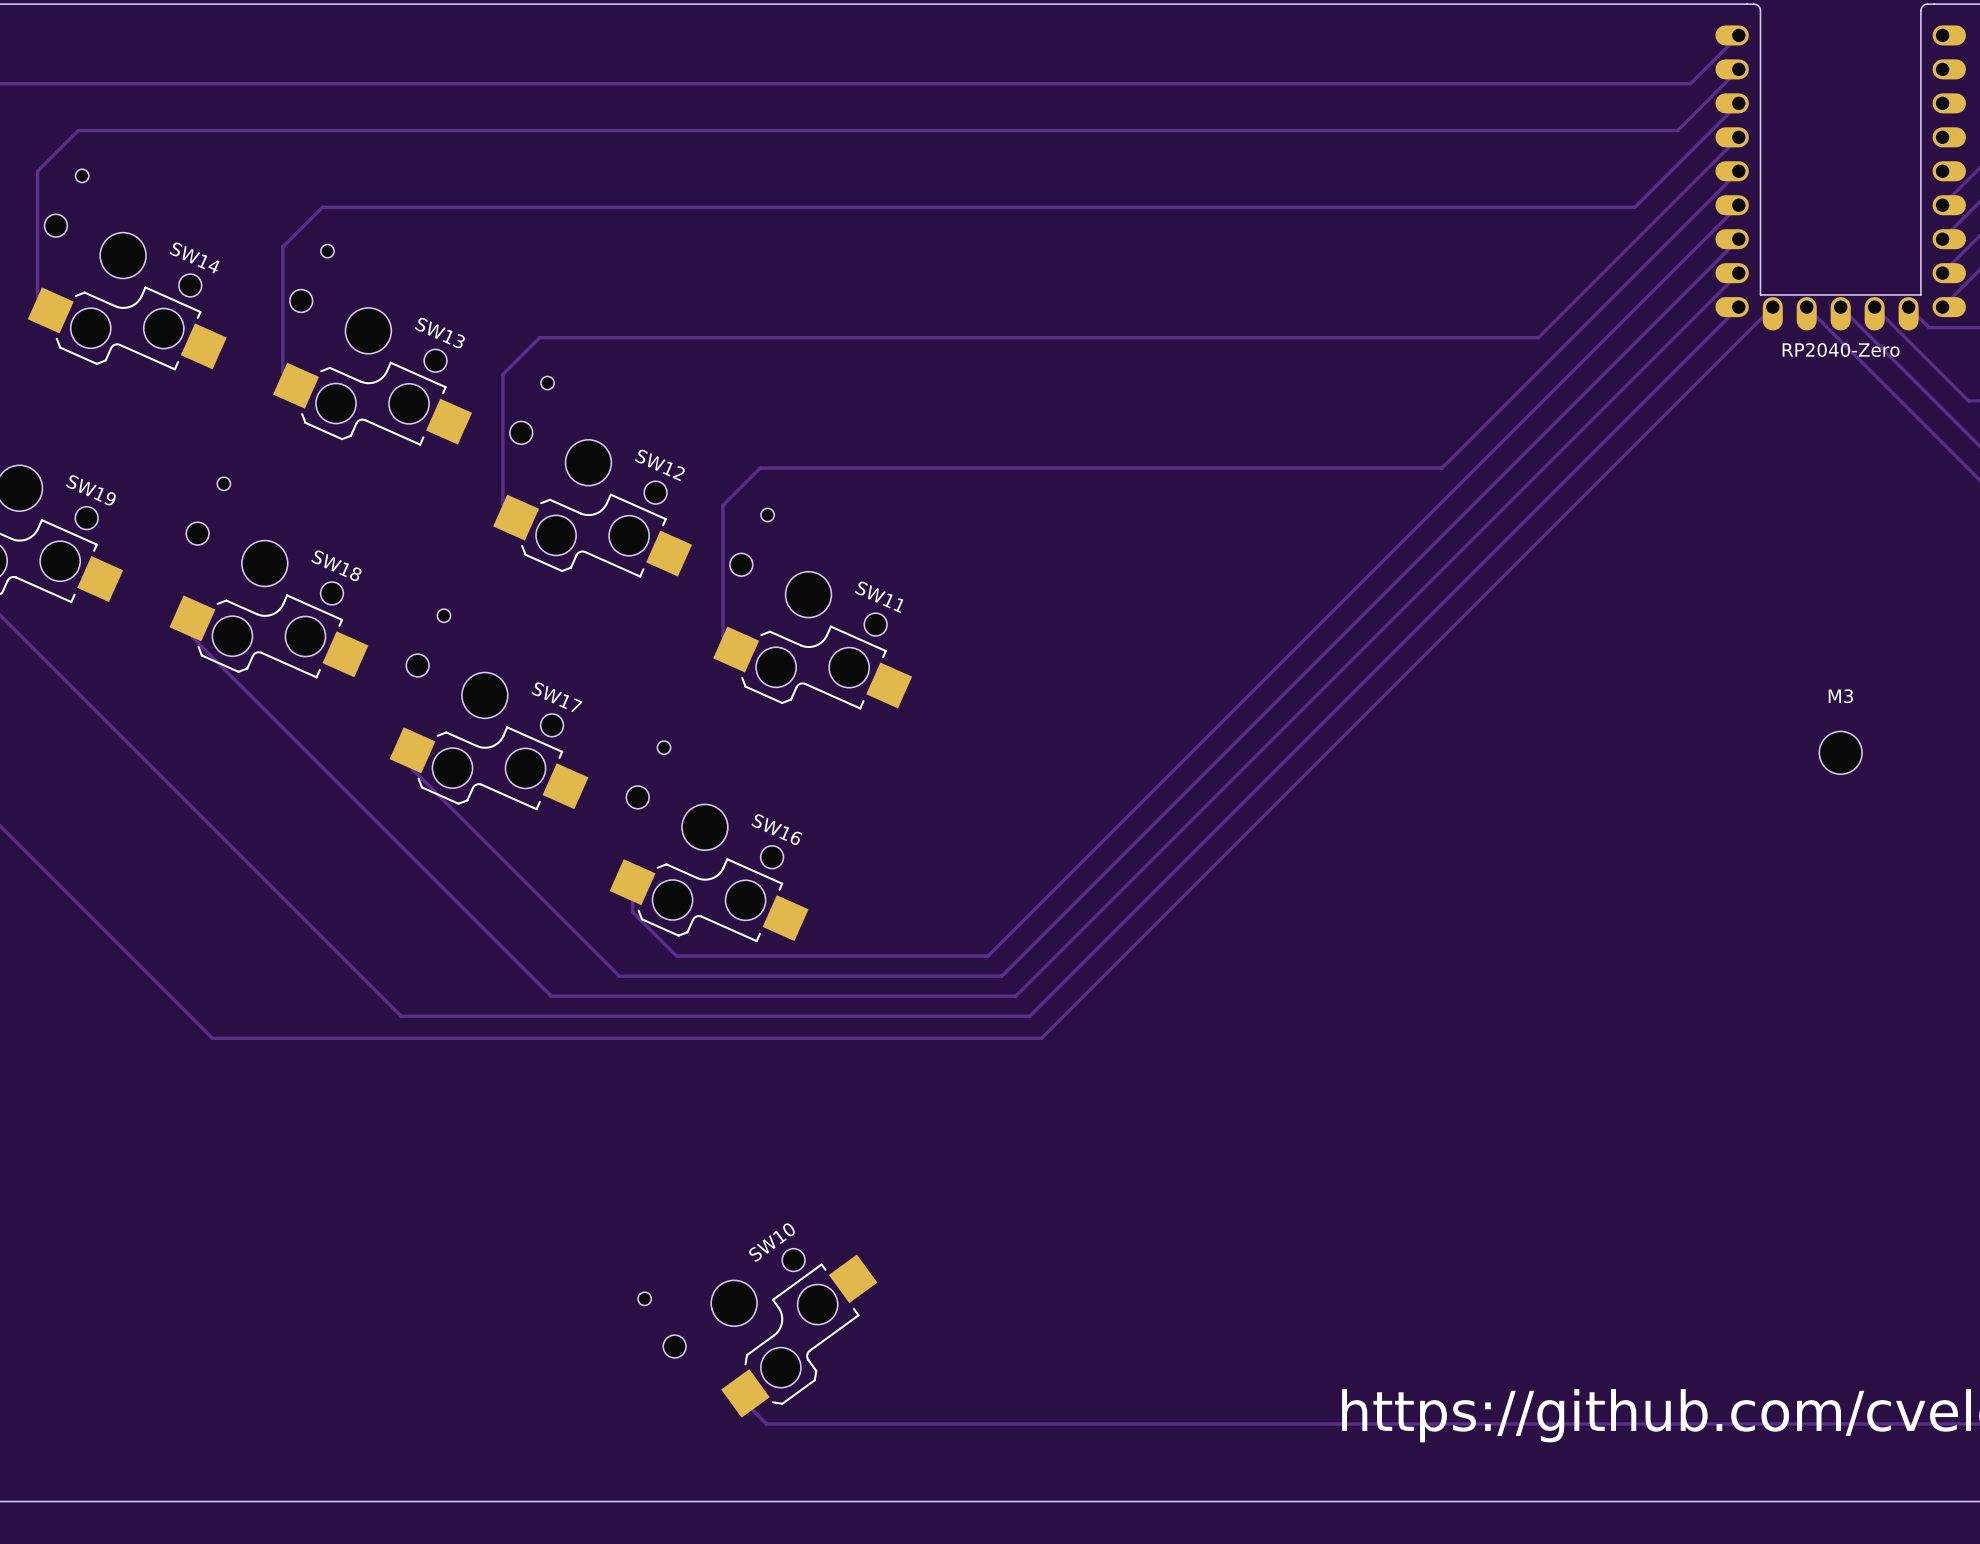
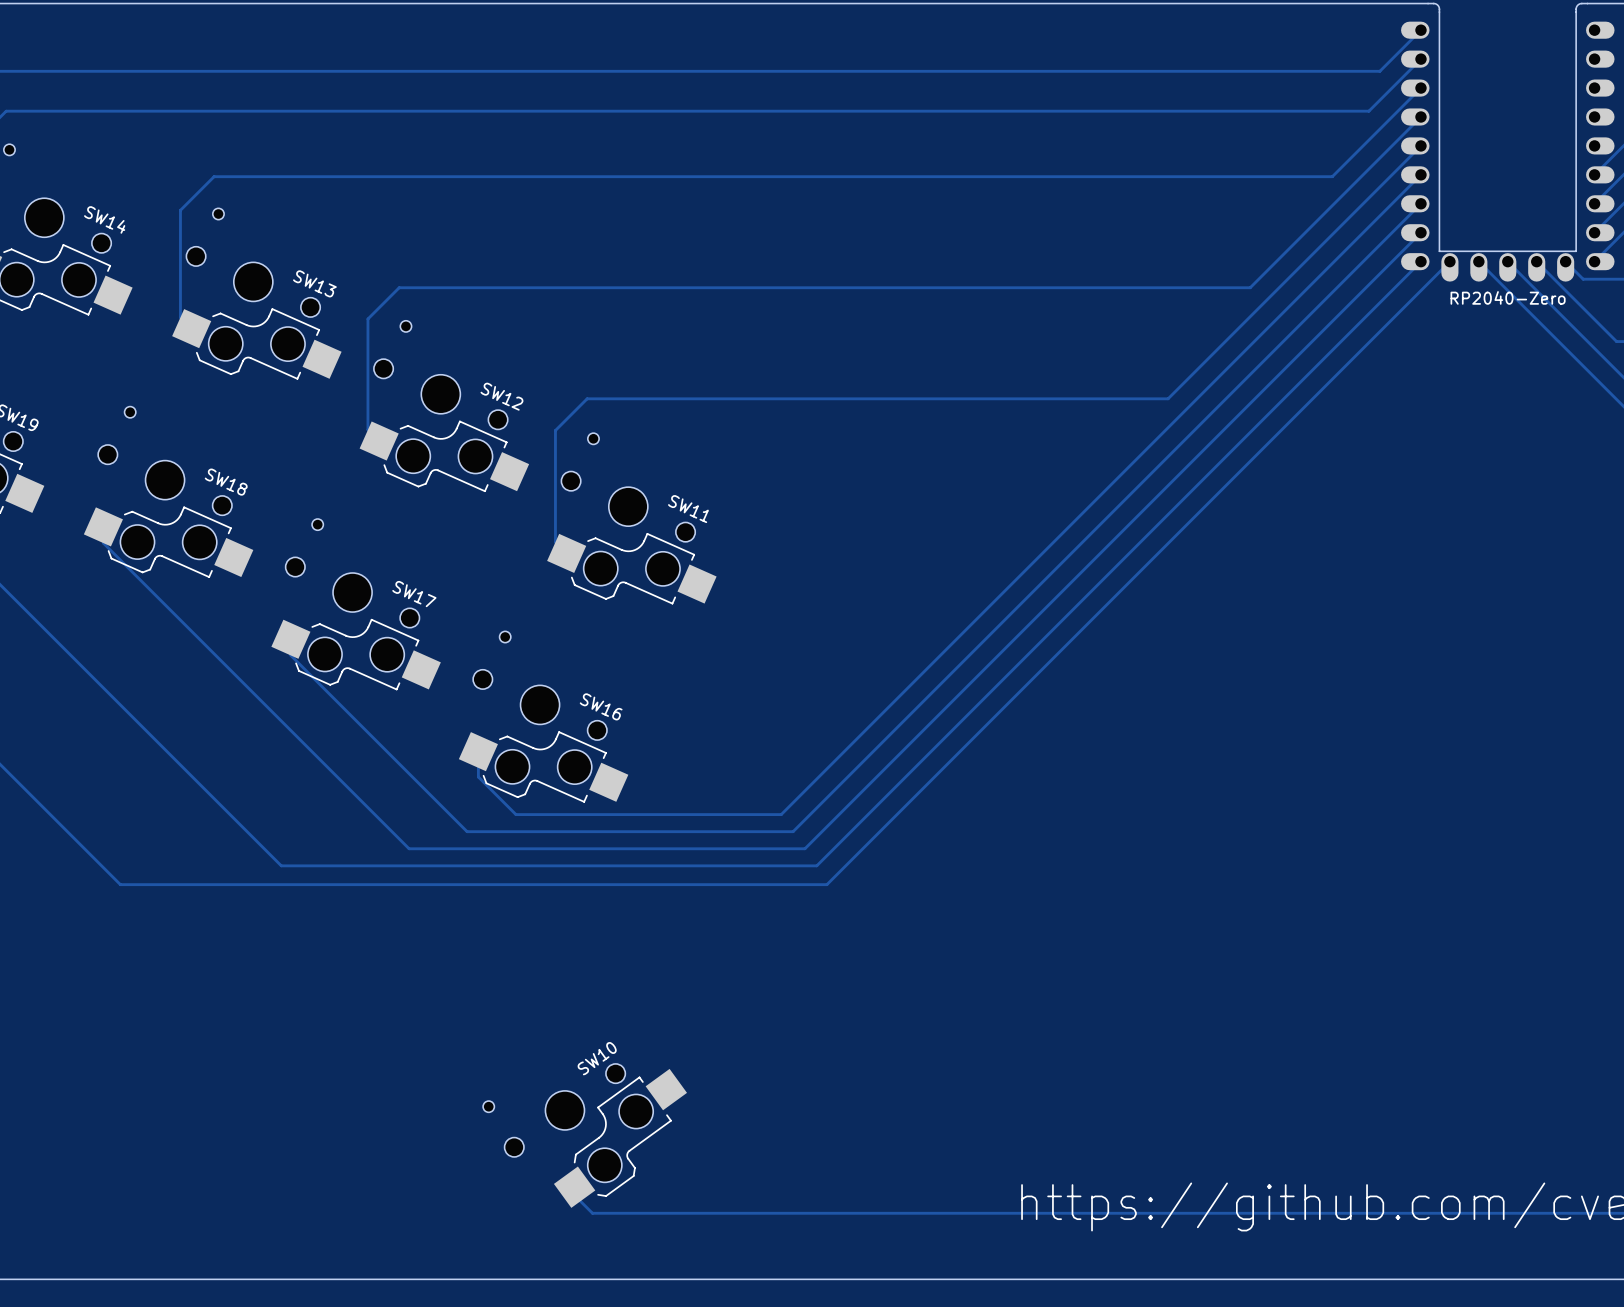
M3: (1840, 752) -> none

